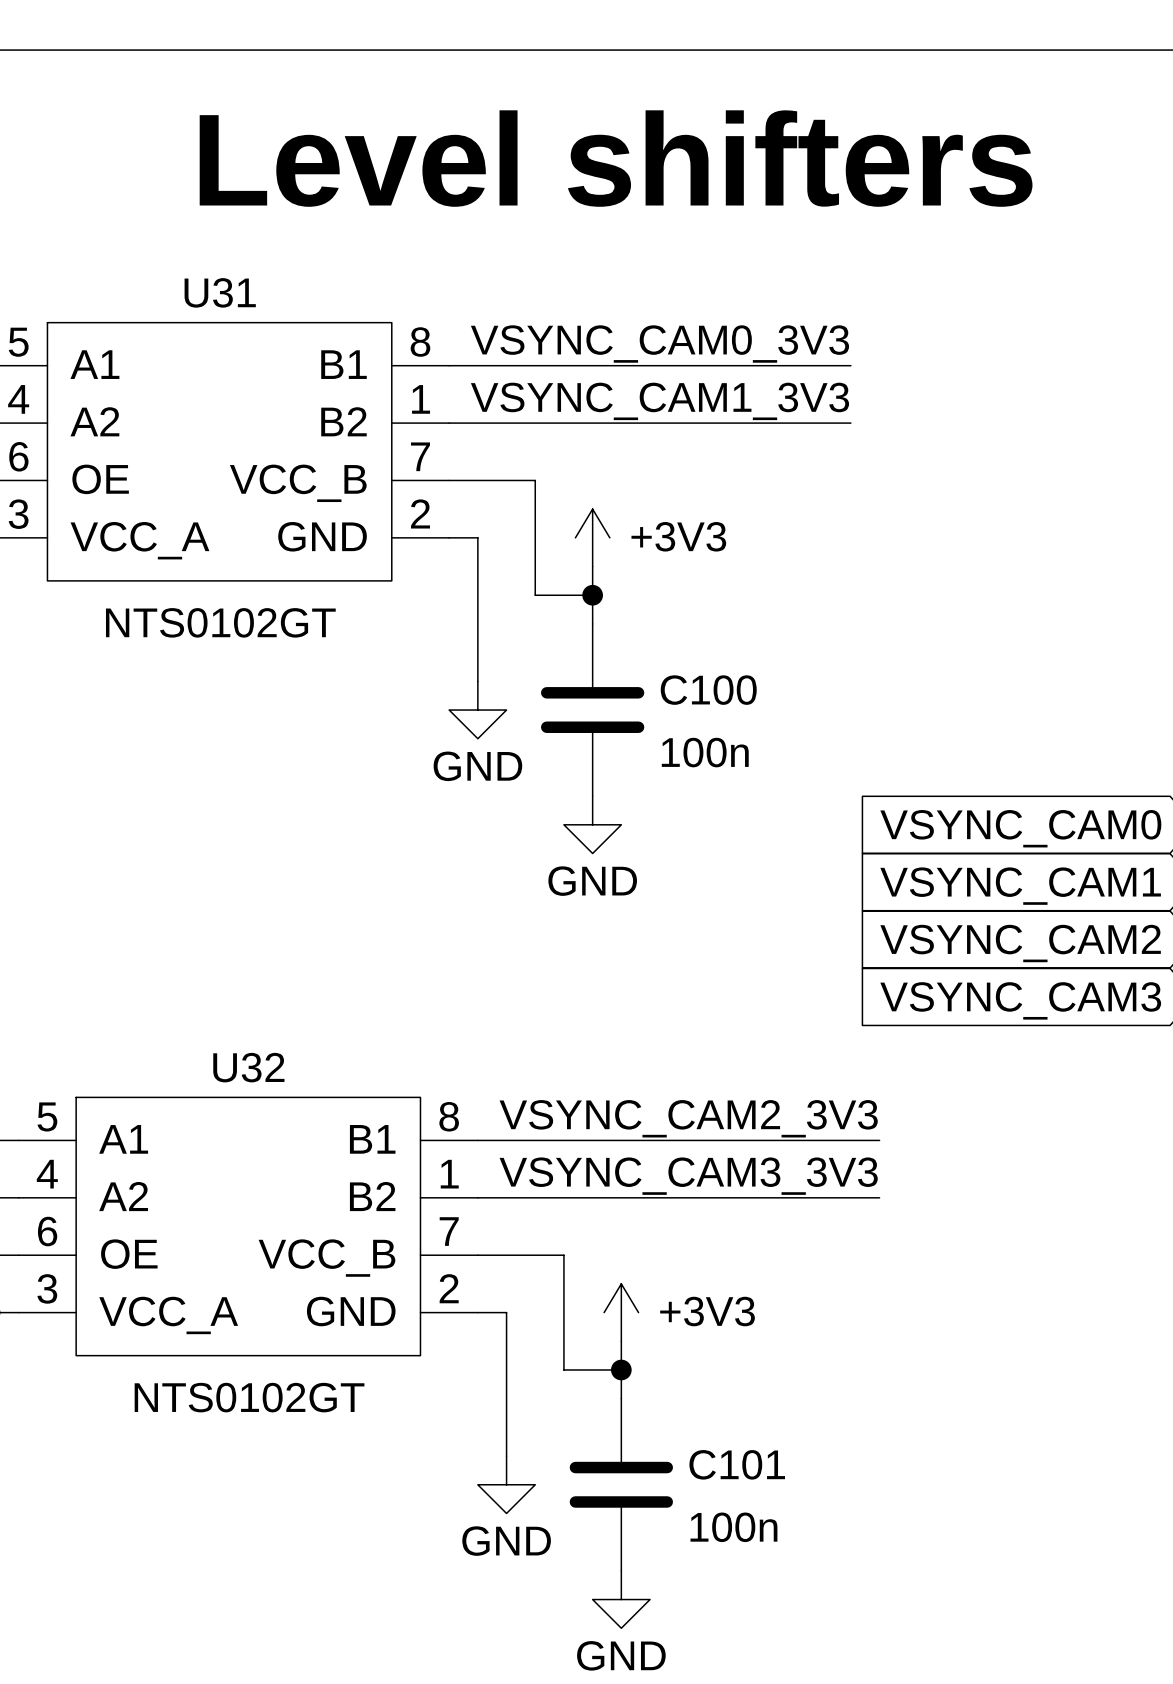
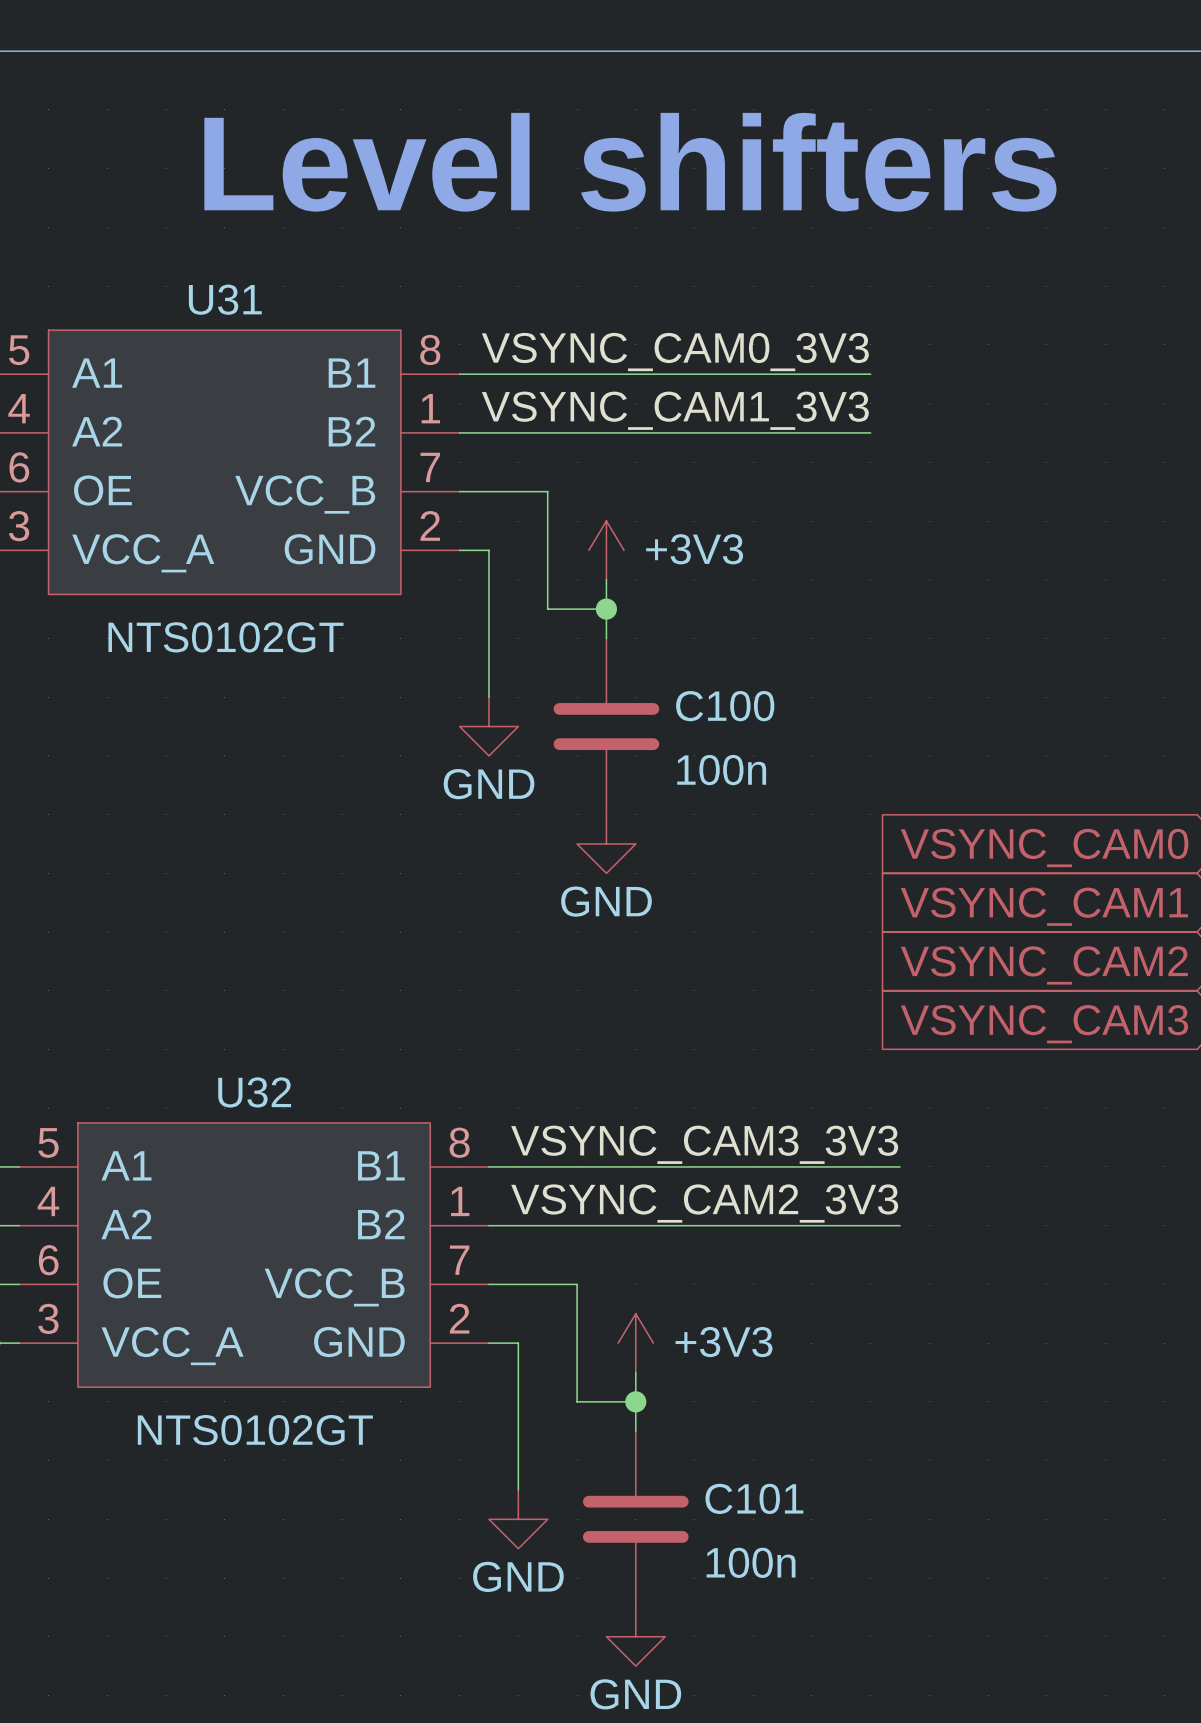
label: VSYNC_CAM2_3V3 (688, 1118) -> VSYNC_CAM3_3V3 (704, 1144)
label: VSYNC_CAM3_3V3 (688, 1176) -> VSYNC_CAM2_3V3 (704, 1203)

